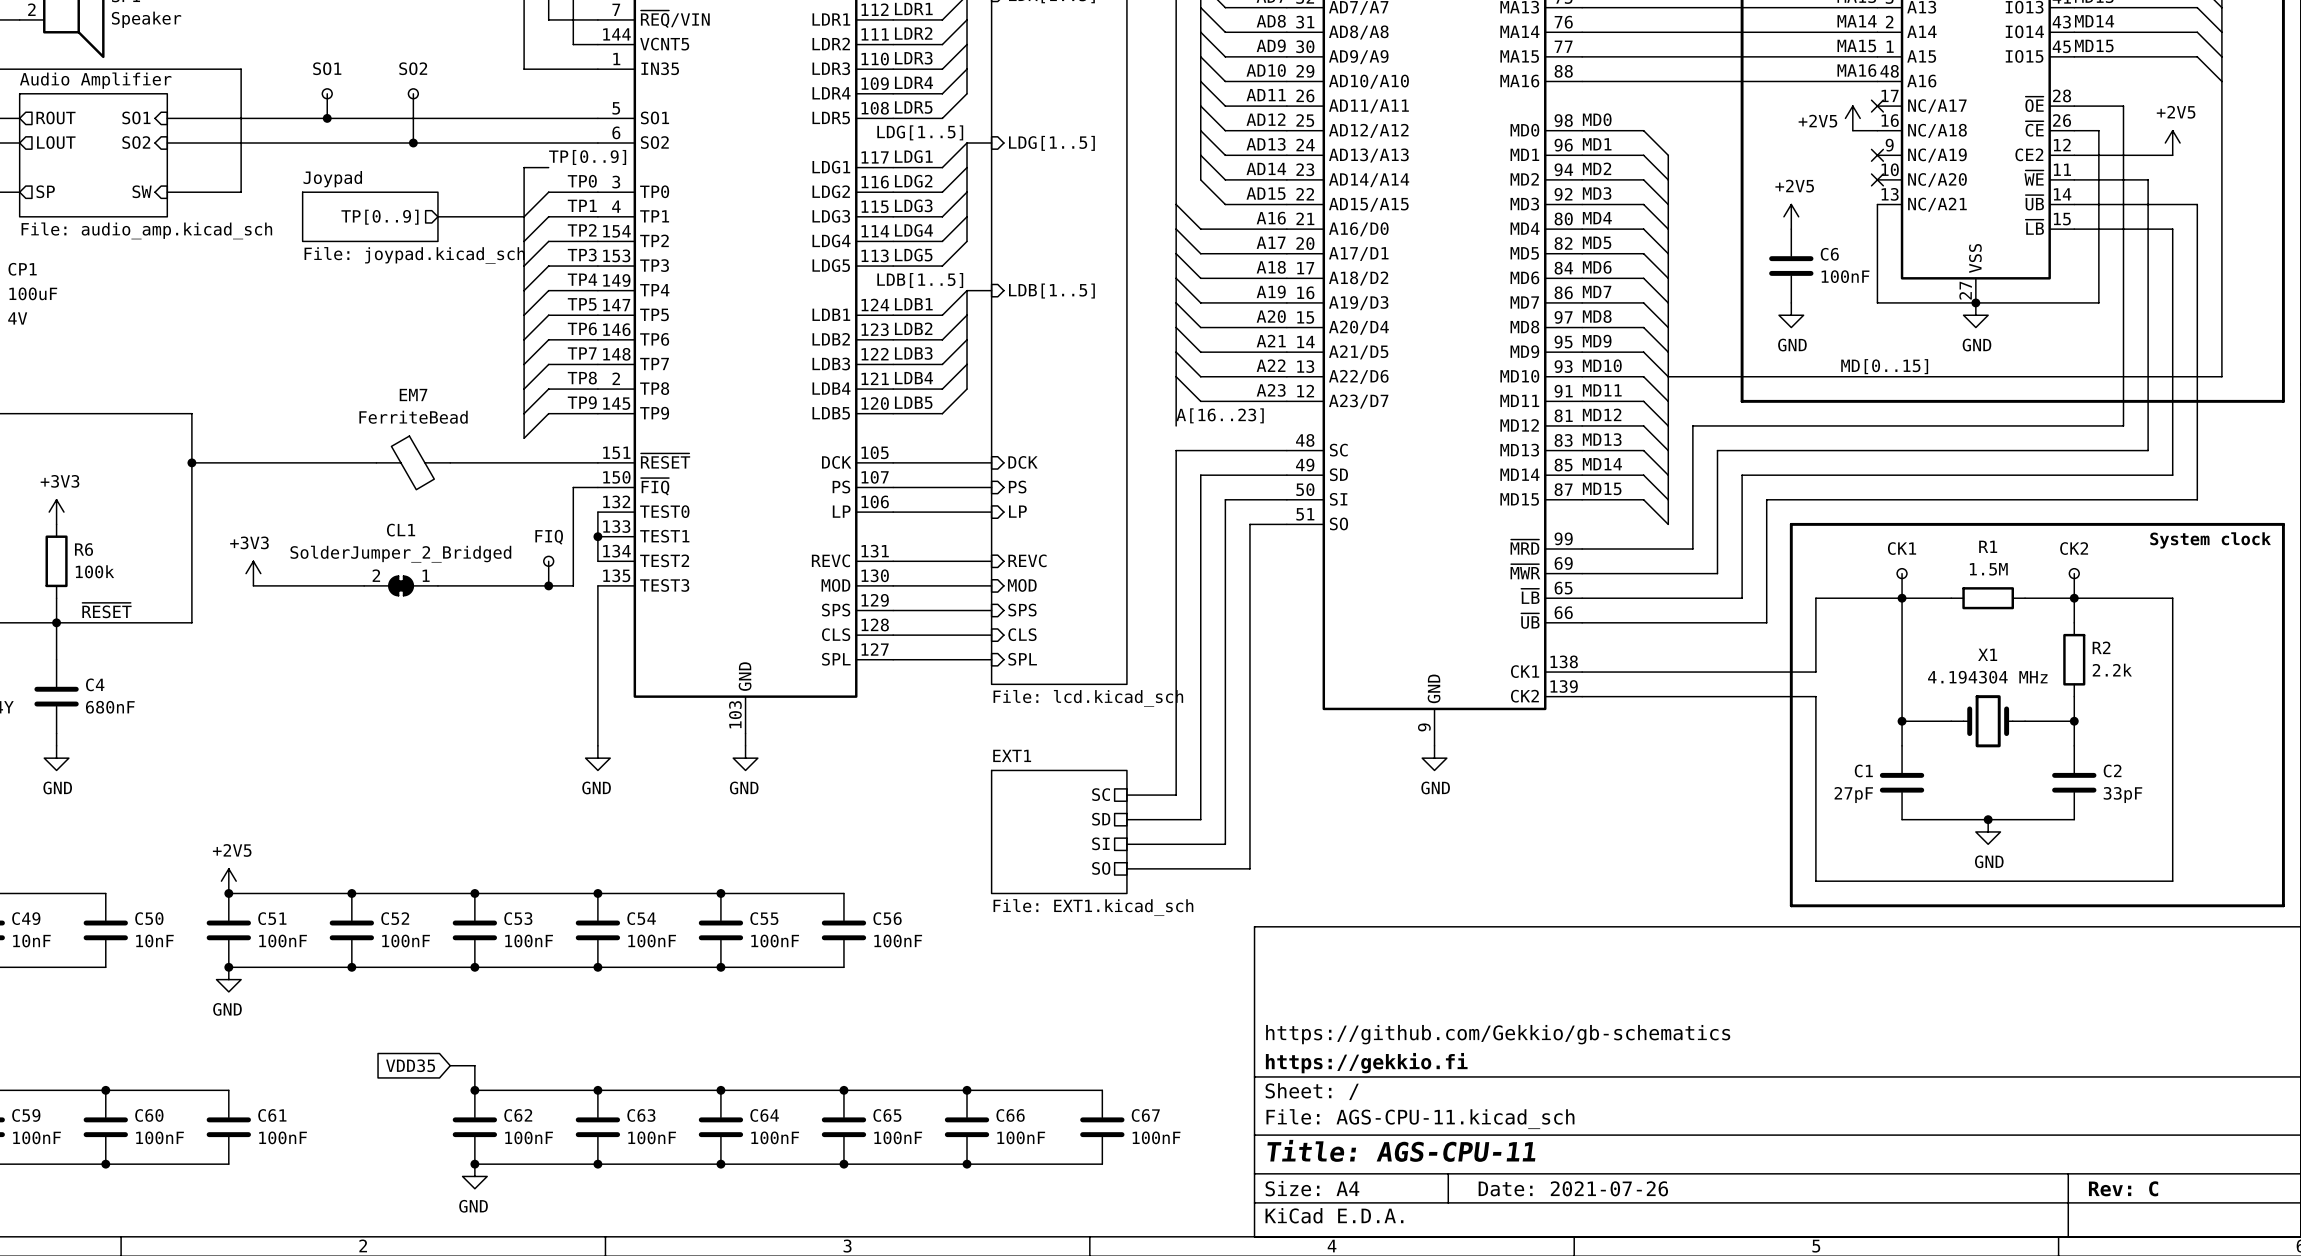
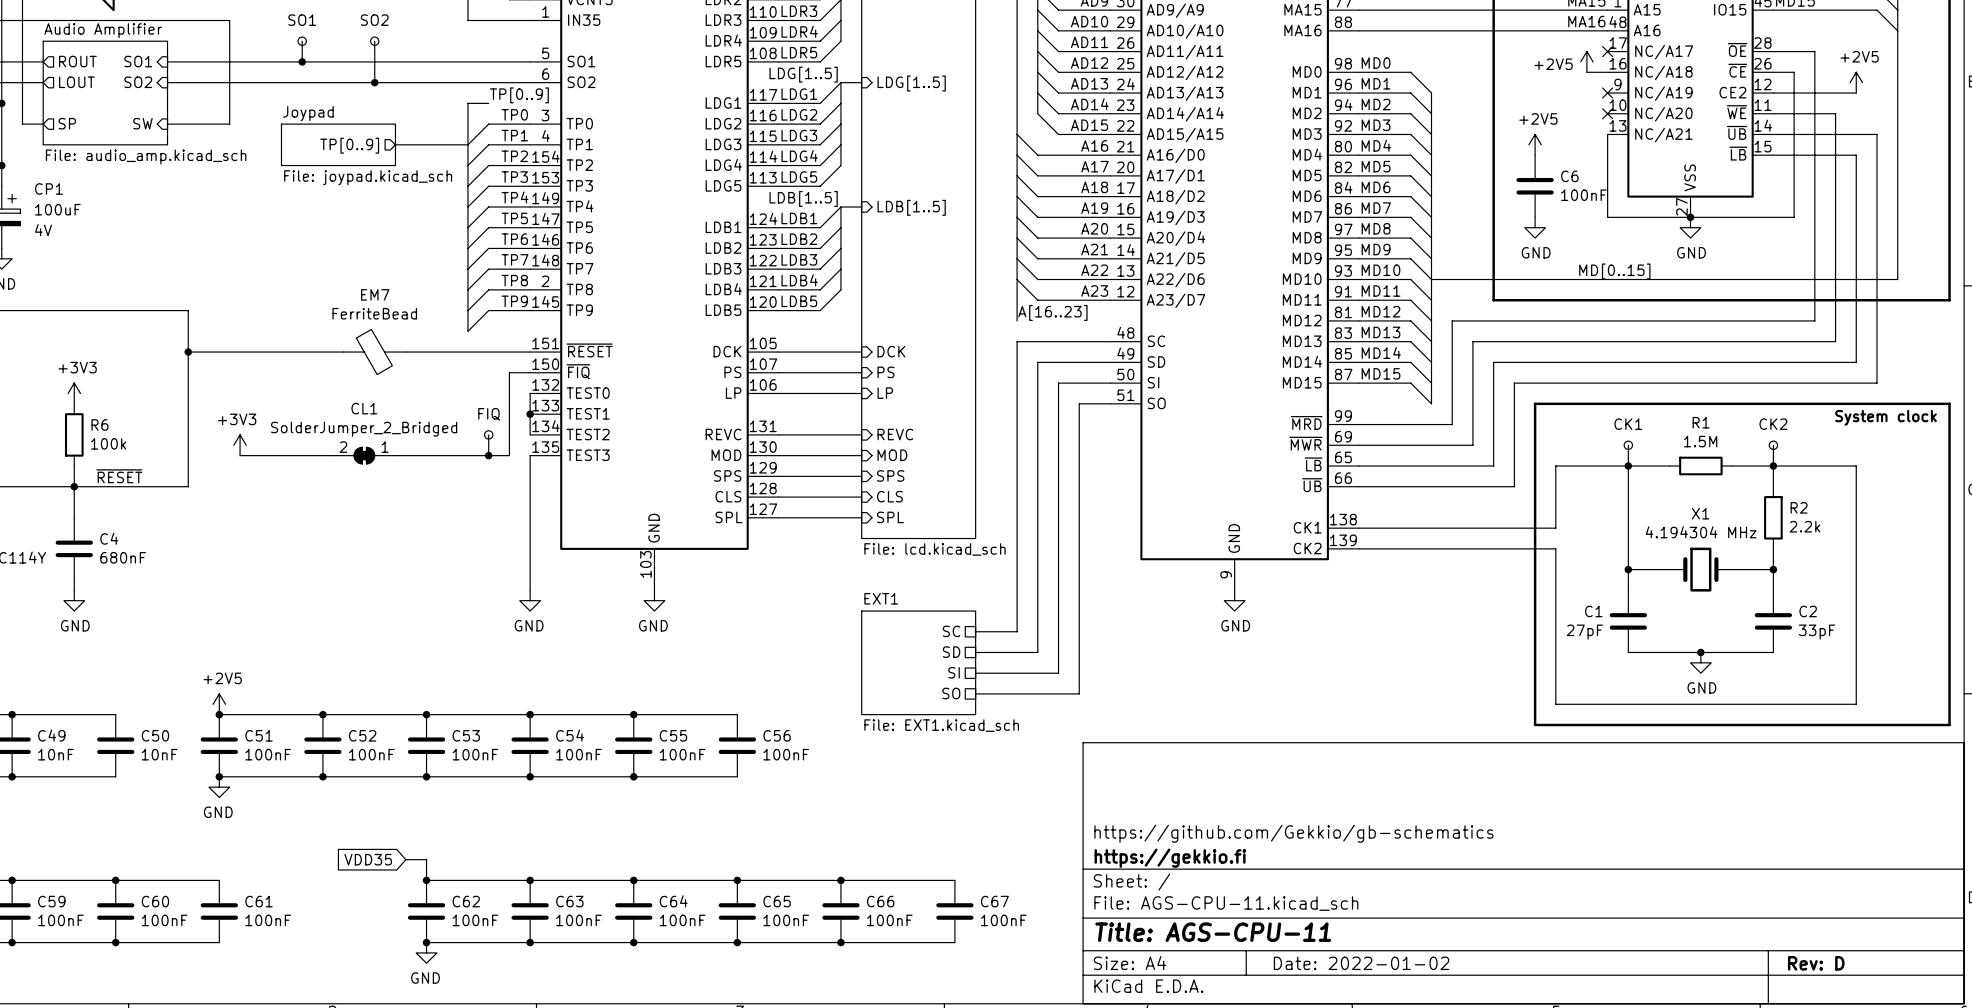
title block: Date: 2021-07-26 (1573, 1188) -> Date: 2022-01-02 (1361, 963)
title block: Rev: C (2123, 1188) -> Rev: D (1816, 963)

